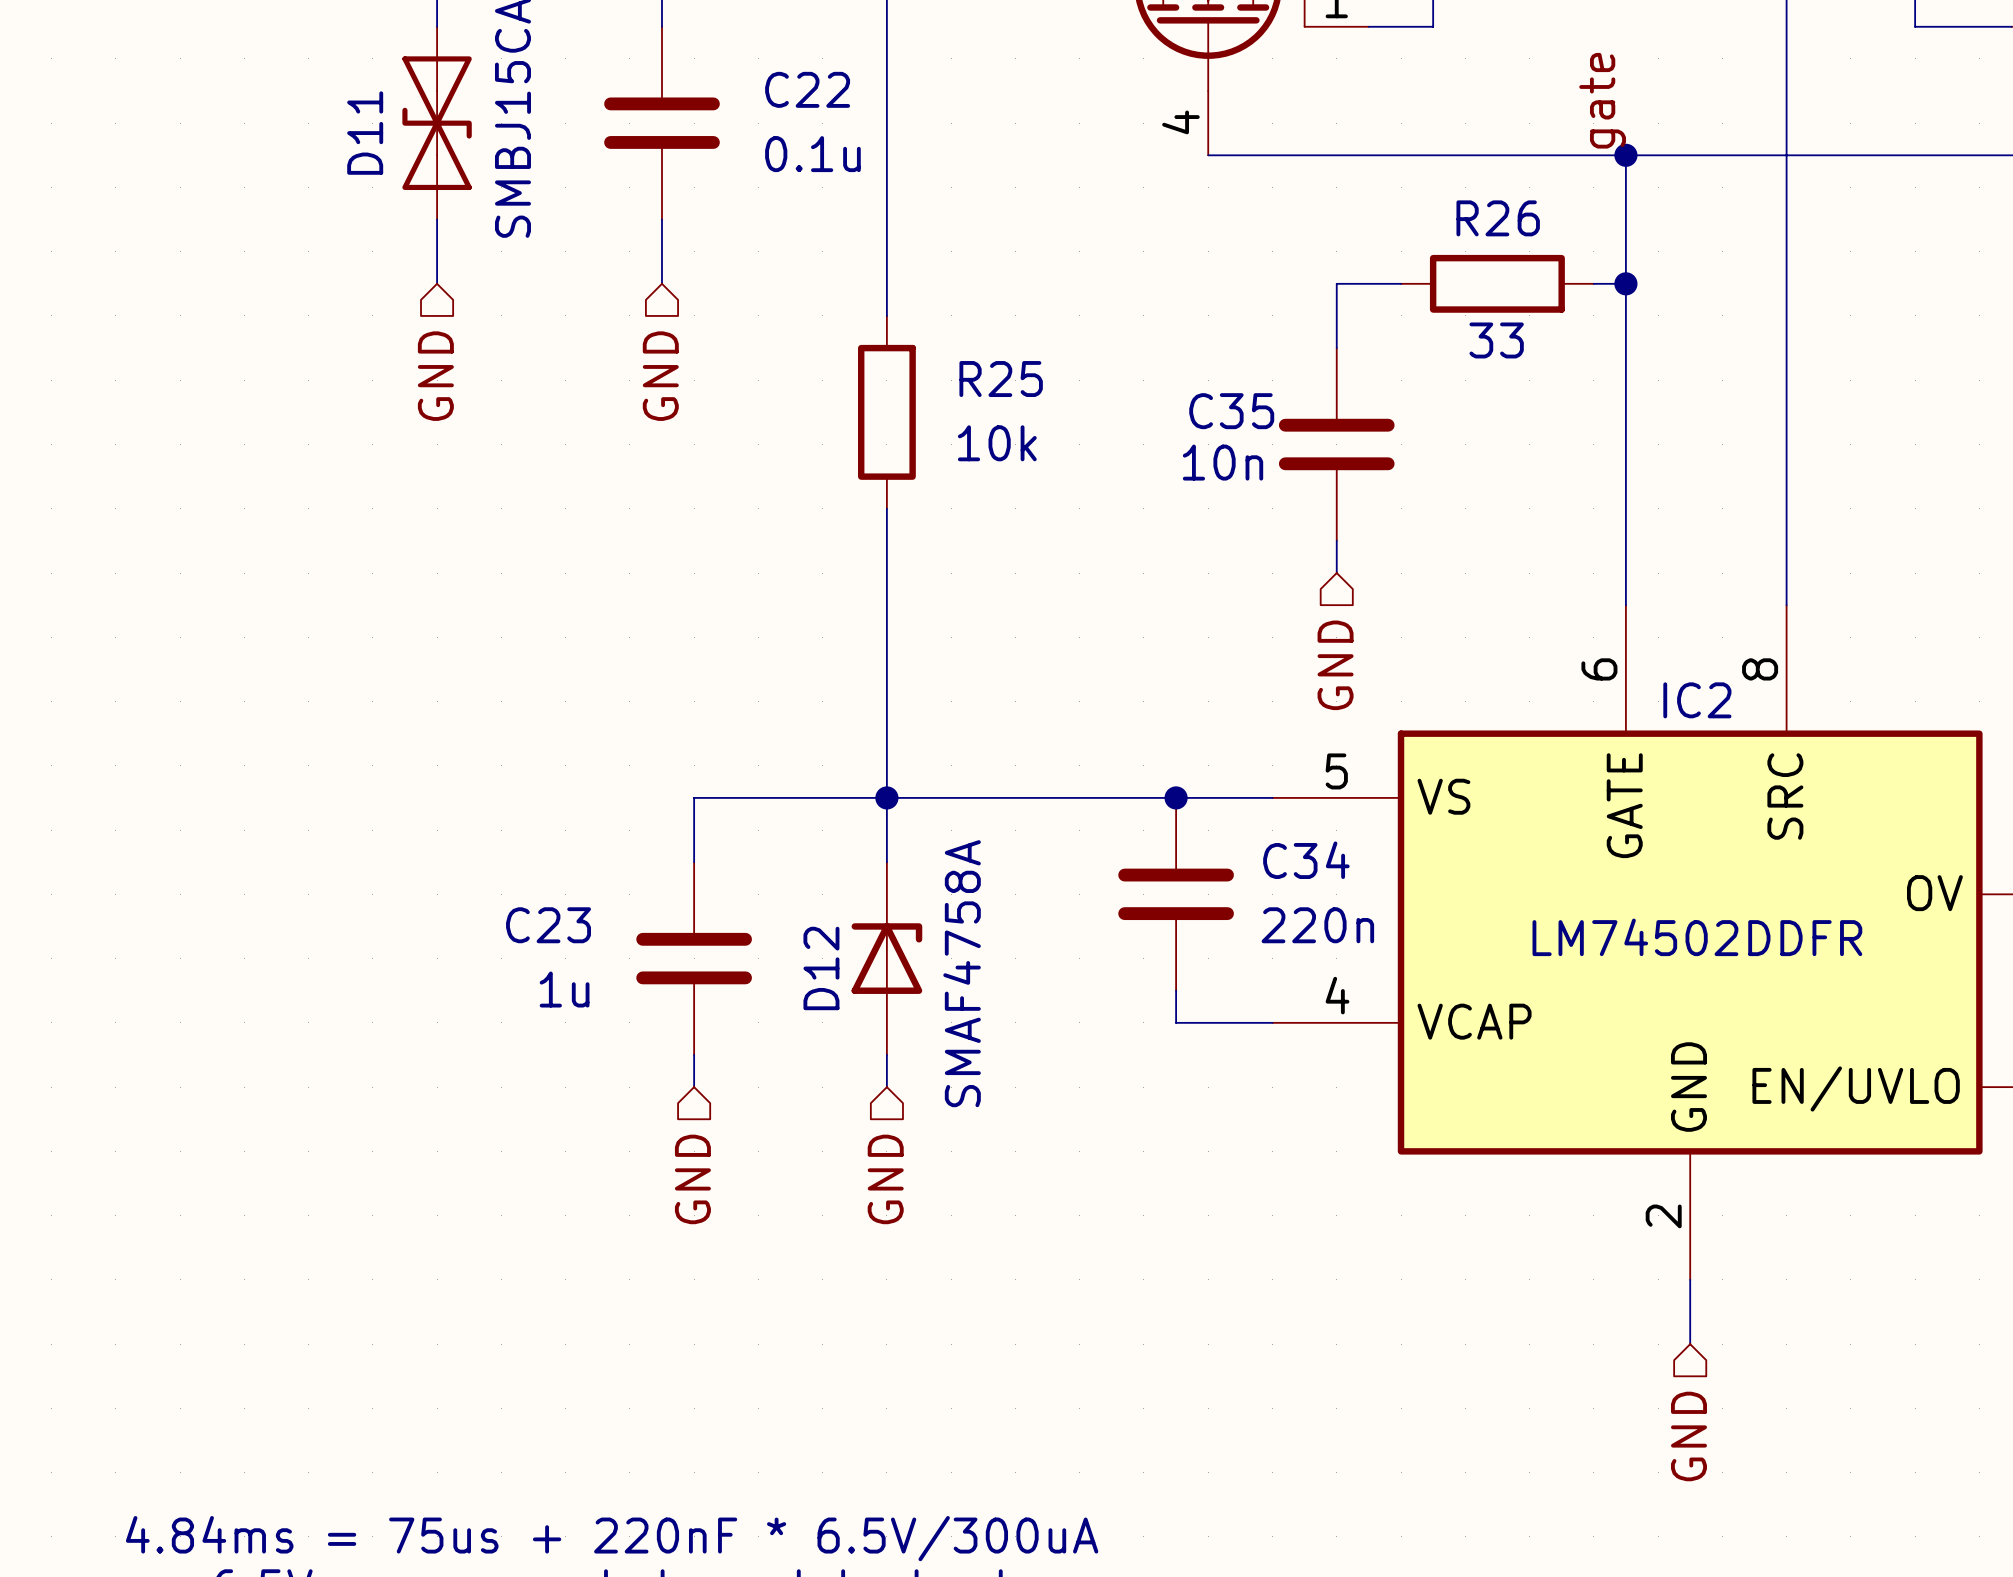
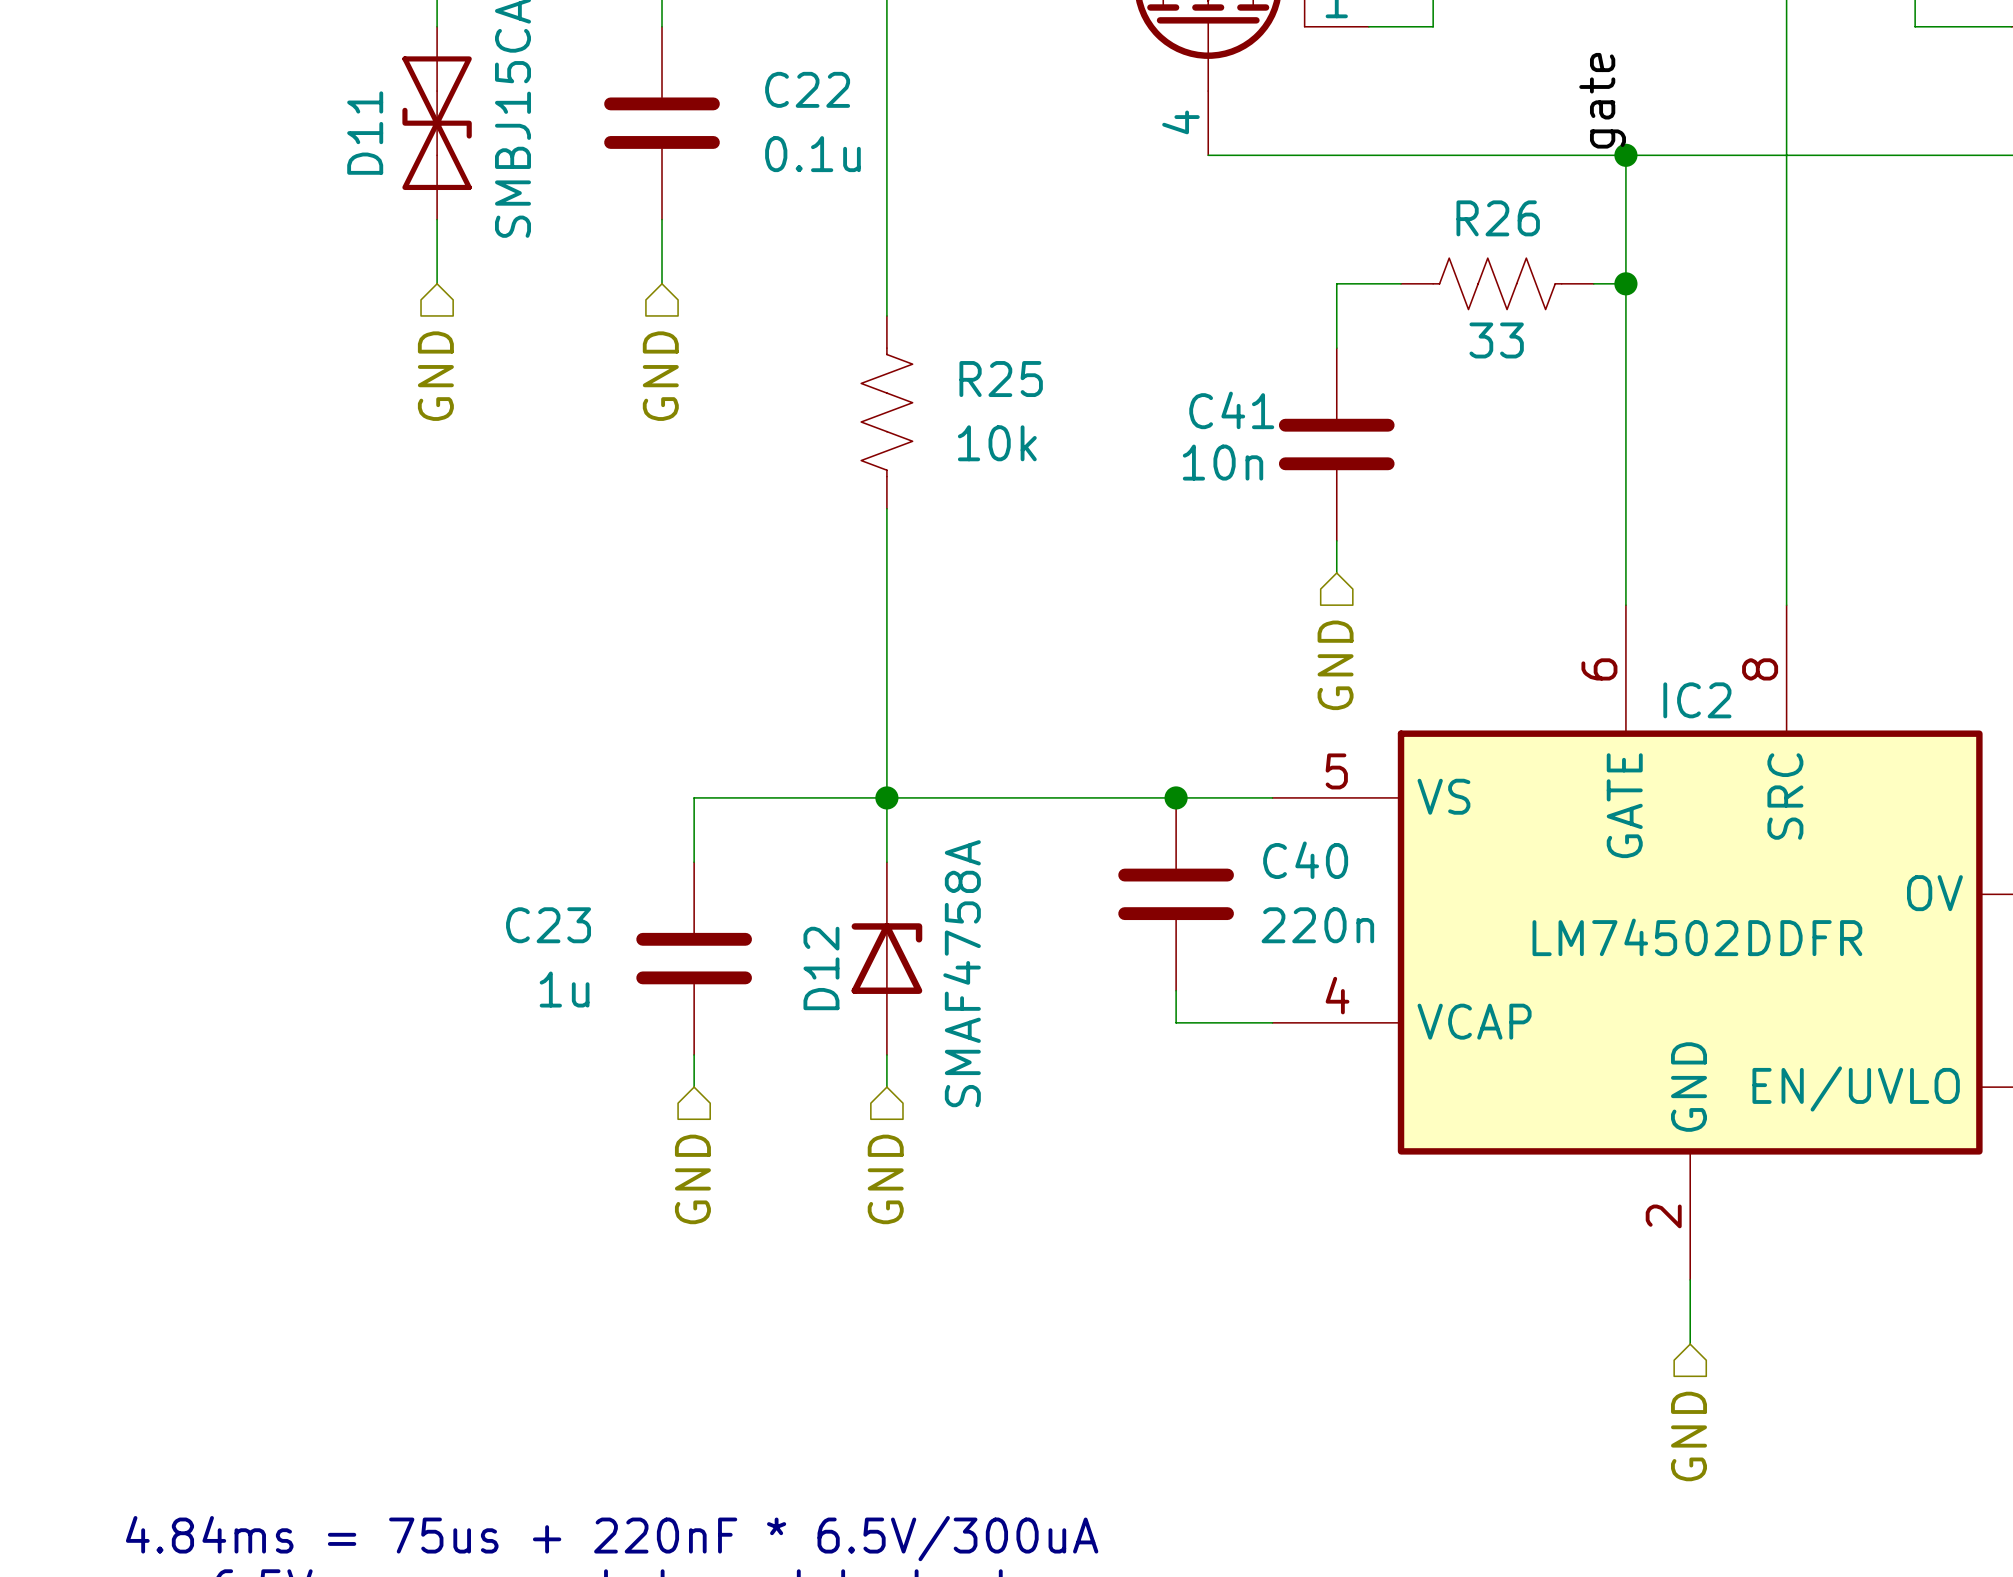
R26 symbol: [1401, 254, 1594, 313] -> [1401, 258, 1594, 310]
R25 symbol: [857, 315, 916, 509] -> [861, 315, 913, 509]
C35 name: C35 (1231, 411) -> C41 (1231, 410)
C34 name: C34 (1306, 860) -> C40 (1305, 860)

